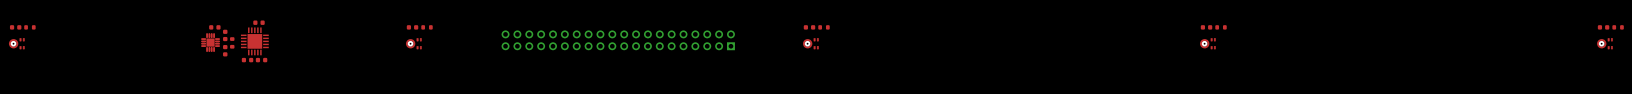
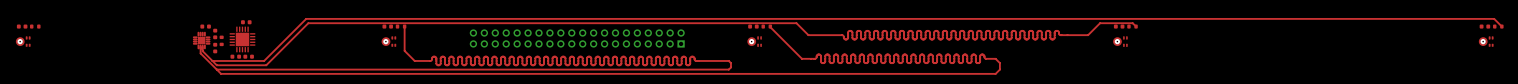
top track: none -> (404, 26) (404, 50) (414, 60) (430, 60) (432, 57) (435, 56) (437, 65) (440, 64) (442, 56) (444, 57) (446, 65) (449, 64) (451, 56) (453, 57) (455, 65) (457, 64) (459, 56) (462, 57) (463, 65) (466, 64) (468, 56) (470, 57) (472, 65) (474, 64) (476, 56) (479, 57) (480, 65) (483, 64) (485, 56) (487, 57) (489, 65) (492, 64) (494, 56) (496, 57) (498, 65) (500, 64) (502, 56) (505, 57) (506, 65) (509, 64) (511, 56) (513, 57) (515, 65) (517, 64) (519, 56) (522, 57) (523, 65) (526, 64) (528, 56) (530, 57) (532, 65) (535, 64) (537, 56) (539, 57) (540, 64) (543, 65) (544, 57) (546, 56) (548, 64) (551, 65) (552, 57) (555, 56) (557, 64) (559, 65) (561, 57) (563, 56) (565, 64) (568, 65) (569, 57) (572, 56) (574, 64) (576, 65) (578, 57) (580, 56) (582, 64) (585, 65) (587, 57) (589, 56) (591, 64) (593, 65) (595, 57) (598, 56) (600, 64) (602, 65) (604, 57) (606, 56) (608, 64) (611, 65) (612, 57) (615, 56) (617, 64) (619, 65) (621, 57) (623, 56) (625, 64) (628, 65) (630, 57) (632, 56) (634, 64) (636, 65) (638, 57) (641, 56) (643, 64) (645, 65) (647, 57) (649, 56) (651, 64) (654, 65) (655, 57) (658, 56) (660, 64) (662, 65) (664, 57) (667, 56) (668, 64) (671, 65) (673, 57) (675, 56) (677, 64) (679, 65) (681, 57) (684, 56) (686, 64) (688, 65) (690, 57) (692, 56) (696, 60) (728, 60) (730, 67) (728, 69) (216, 69)
top track: none -> (770, 26) (801, 58) (815, 58) (819, 54) (822, 63) (825, 62) (826, 54) (829, 55) (830, 62) (833, 62) (833, 55) (836, 54) (838, 62) (841, 63) (842, 55) (845, 54) (846, 62) (849, 63) (851, 55) (853, 54) (855, 62) (858, 63) (859, 55) (862, 54) (864, 62) (866, 63) (868, 55) (870, 54) (872, 62) (875, 63) (877, 55) (879, 54) (881, 62) (883, 63) (885, 55) (888, 54) (889, 62) (892, 63) (894, 55) (896, 54) (898, 62) (901, 63) (902, 55) (905, 54) (907, 62) (909, 63) (911, 55) (913, 54) (915, 62) (918, 63) (920, 55) (922, 54) (924, 62) (926, 63) (928, 55) (931, 54) (933, 62) (935, 63) (937, 55) (939, 54) (941, 62) (944, 63) (945, 55) (948, 54) (950, 62) (952, 63) (954, 55) (956, 54) (958, 62) (961, 63) (963, 55) (965, 54) (967, 62) (970, 63) (971, 55) (974, 54) (976, 62) (978, 63) (980, 55) (982, 54) (985, 58) (995, 58) (999, 63) (999, 69) (995, 73) (221, 73) (200, 53) (200, 46)
top track: none -> (1136, 26) (1132, 23) (1100, 23) (1088, 35) (1060, 35) (1056, 30) (1052, 39) (1050, 38) (1048, 30) (1046, 31) (1044, 39) (1041, 38) (1040, 30) (1037, 31) (1035, 39) (1033, 38) (1031, 30) (1029, 31) (1027, 39) (1024, 38) (1022, 30) (1020, 31) (1018, 39) (1016, 38) (1014, 30) (1011, 31) (1009, 39) (1007, 38) (1005, 30) (1003, 31) (1001, 39) (998, 38) (997, 30) (994, 31) (992, 39) (990, 38) (988, 30) (985, 31) (984, 39) (981, 38) (979, 30) (977, 31) (975, 39) (973, 38) (971, 30) (968, 31) (967, 39) (964, 38) (962, 30) (960, 31) (958, 39) (955, 38) (953, 30) (951, 31) (949, 39) (947, 38) (945, 30) (942, 31) (941, 39) (938, 38) (936, 30) (934, 31) (932, 39) (930, 38) (928, 30) (925, 31) (924, 39) (921, 38) (919, 30) (917, 31) (915, 39) (912, 38) (910, 30) (908, 31) (907, 39) (904, 38) (902, 30) (899, 32) (898, 39) (895, 38) (895, 32) (892, 30) (890, 38) (888, 39) (886, 31) (884, 30) (882, 38) (879, 39) (878, 31) (875, 30) (873, 38) (870, 39) (869, 31) (867, 30) (865, 38) (862, 39) (860, 31) (858, 30) (856, 38) (853, 39) (852, 31) (849, 30) (847, 38) (845, 39) (842, 35) (808, 35) (796, 23) (308, 23) (266, 65) (216, 65) (202, 51) (202, 46)
top track: none -> (1501, 26) (1494, 18) (306, 18) (264, 60) (212, 60)

